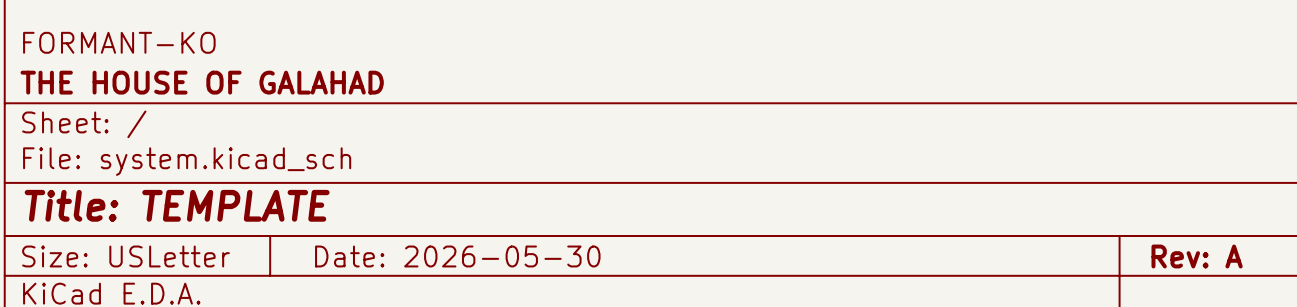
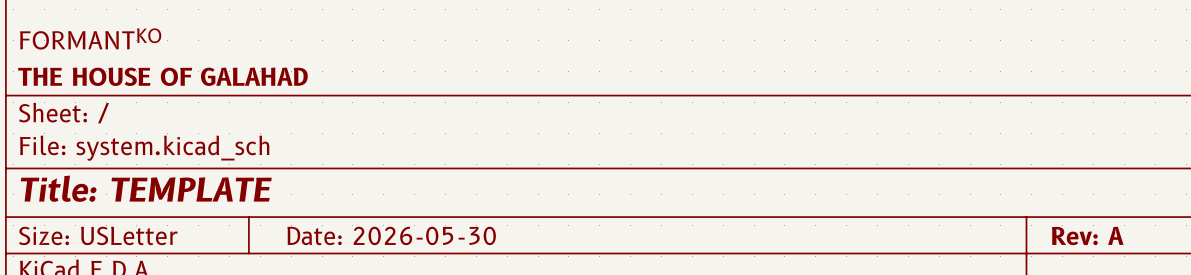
title block: FORMANT-KO (119, 42) -> FORMANTKO (90, 38)

